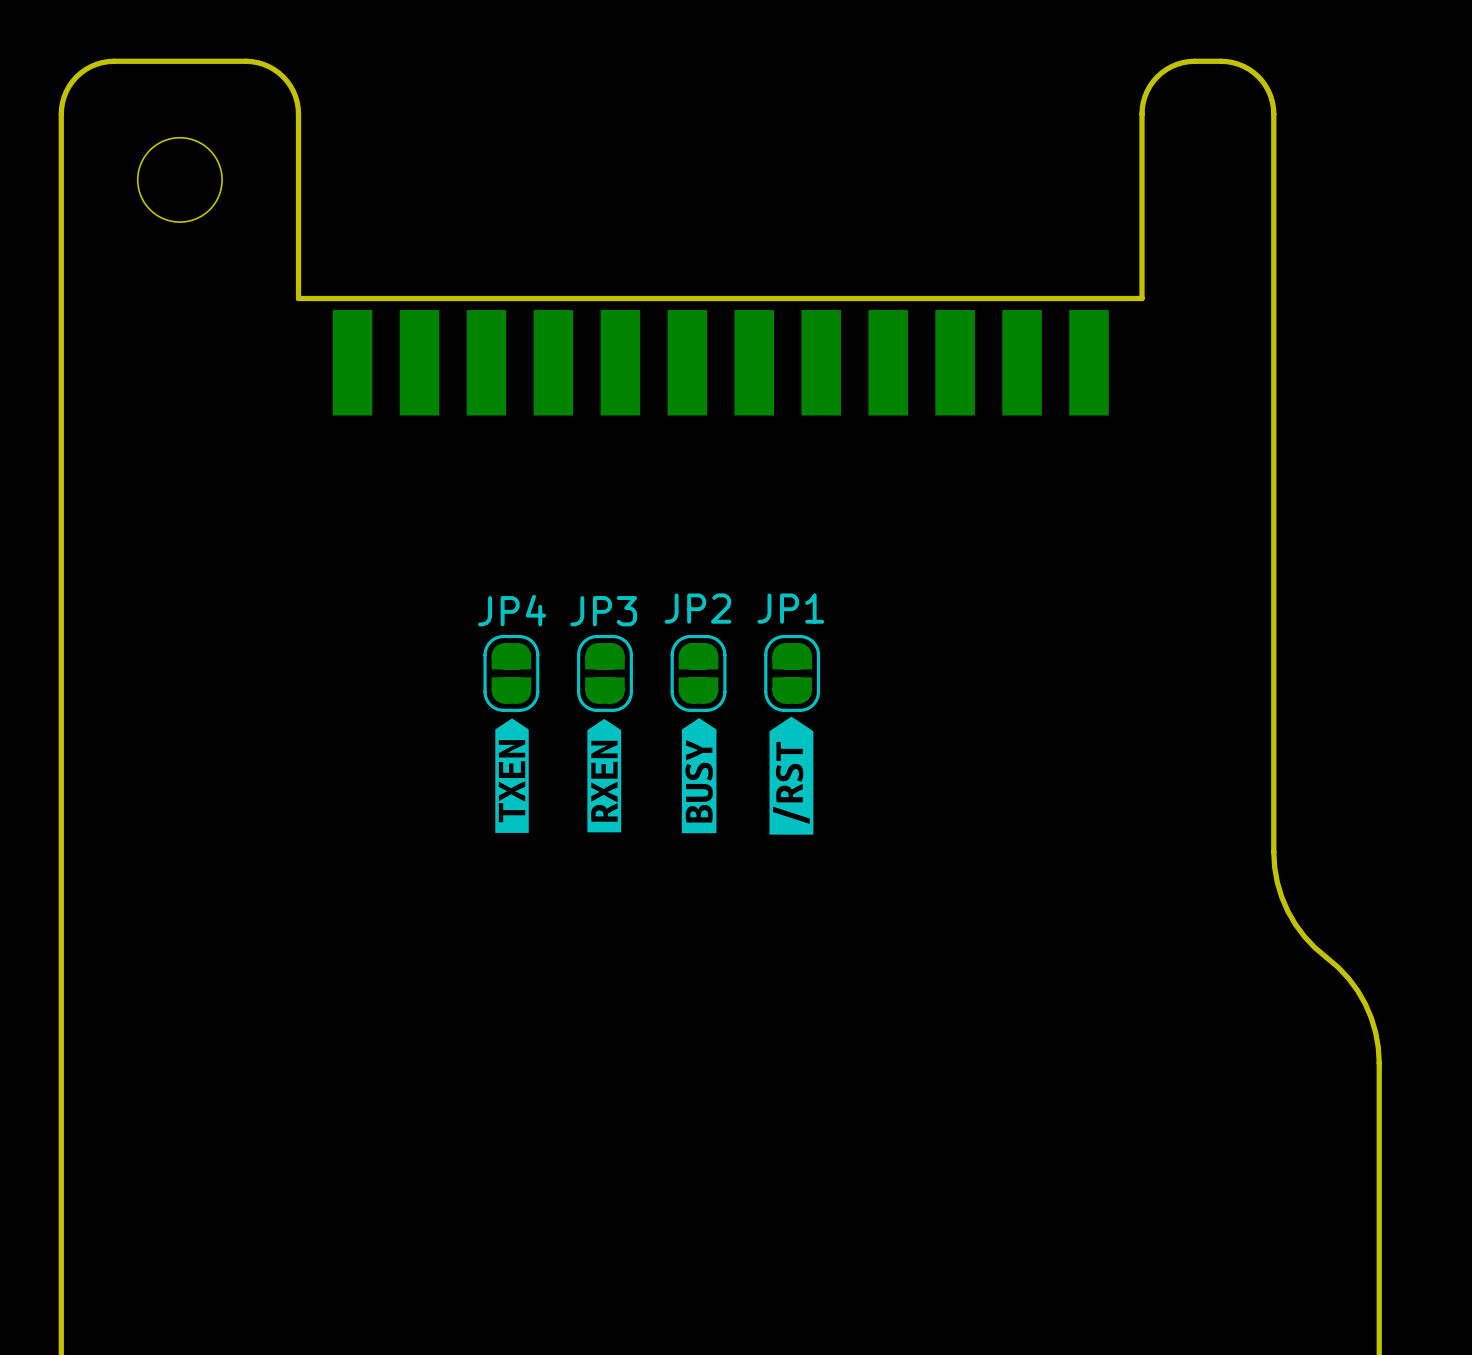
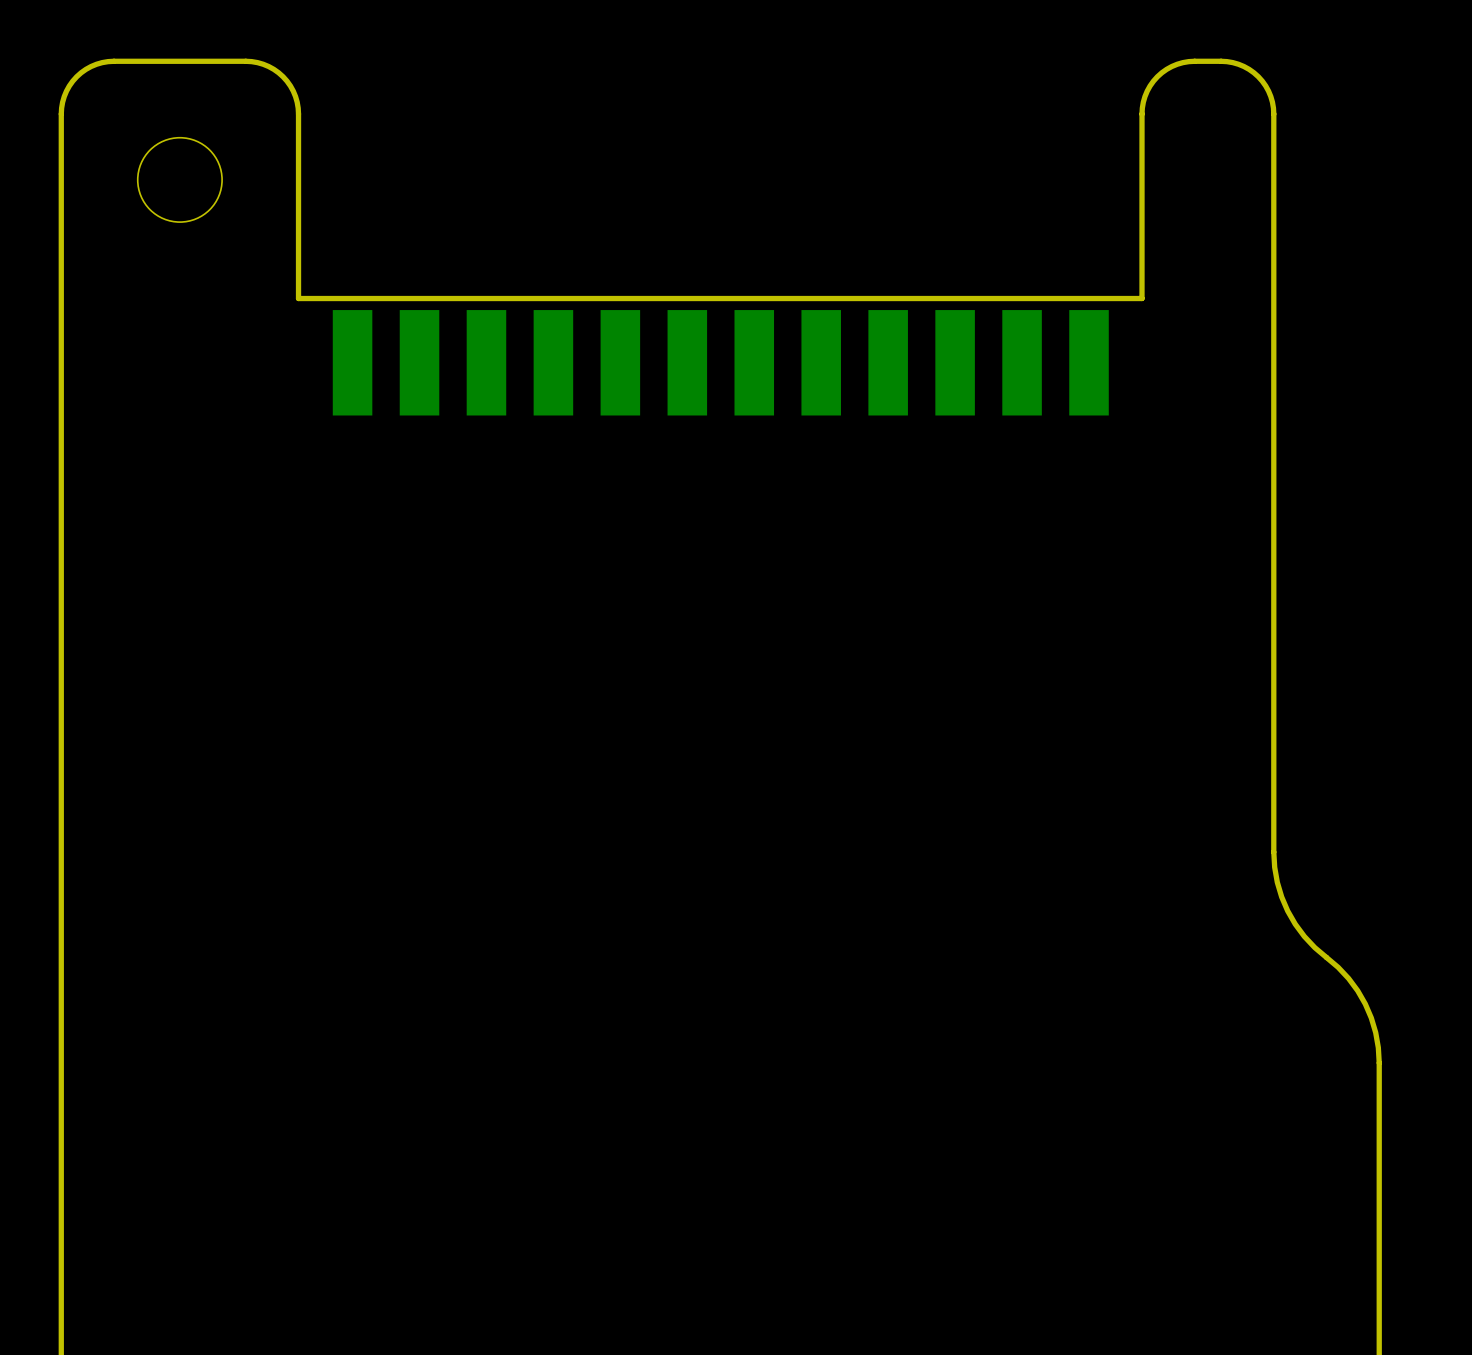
JP4: (511, 673) -> none
JP3: (604, 673) -> none
JP2: (698, 673) -> none
JP1: (792, 673) -> none
drawing: [769, 716, 814, 835] -> none
drawing: [495, 718, 529, 833] -> none
drawing: [587, 718, 622, 833] -> none
drawing: [681, 718, 717, 834] -> none

